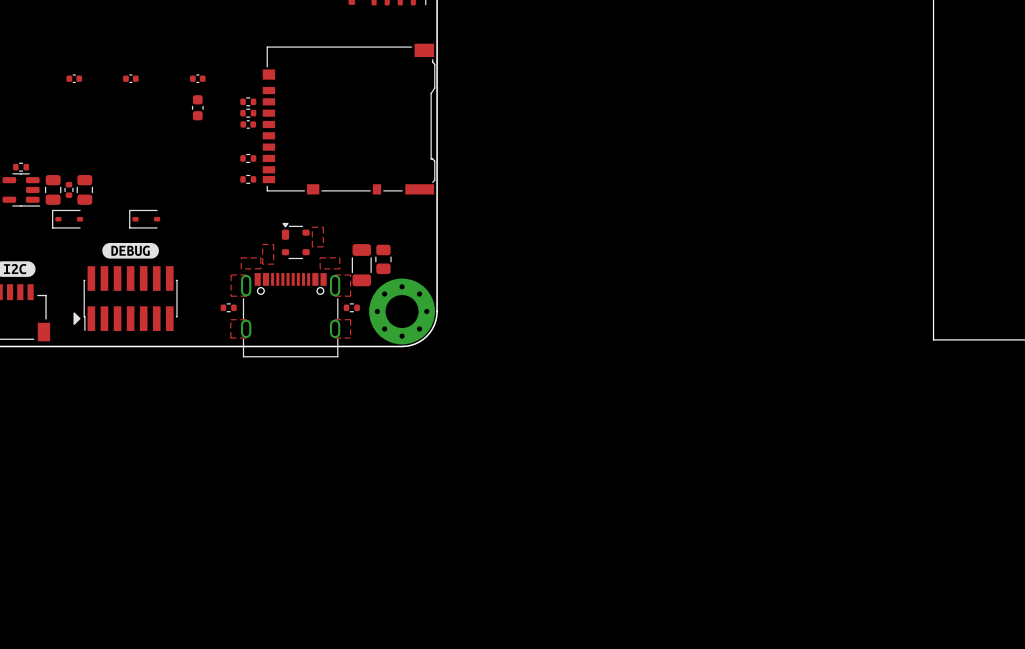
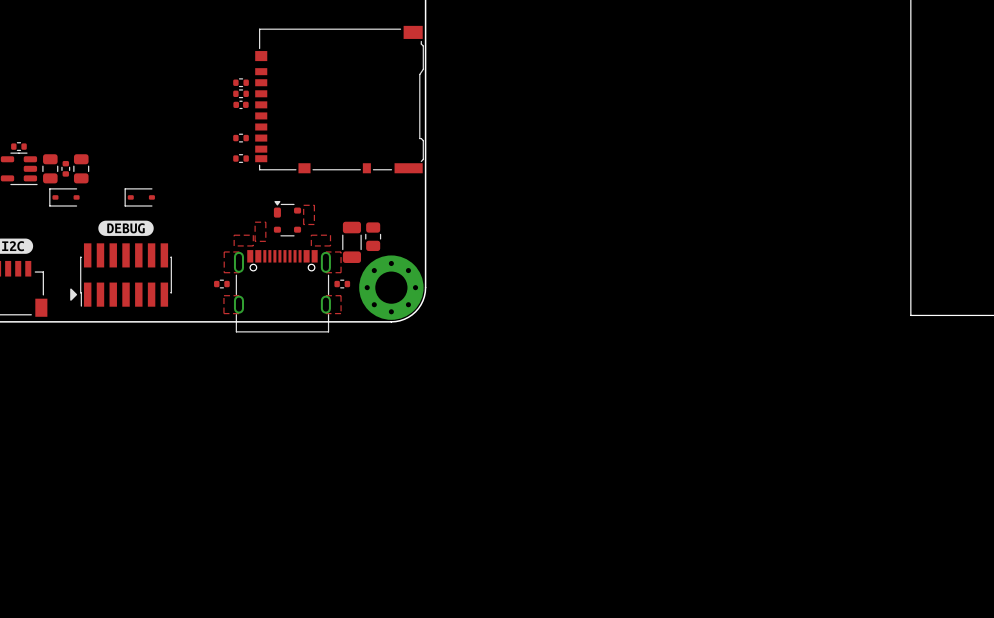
part: (74, 78) -> none
part: (130, 78) -> none
part: (197, 78) -> none
part: (197, 107) -> none

